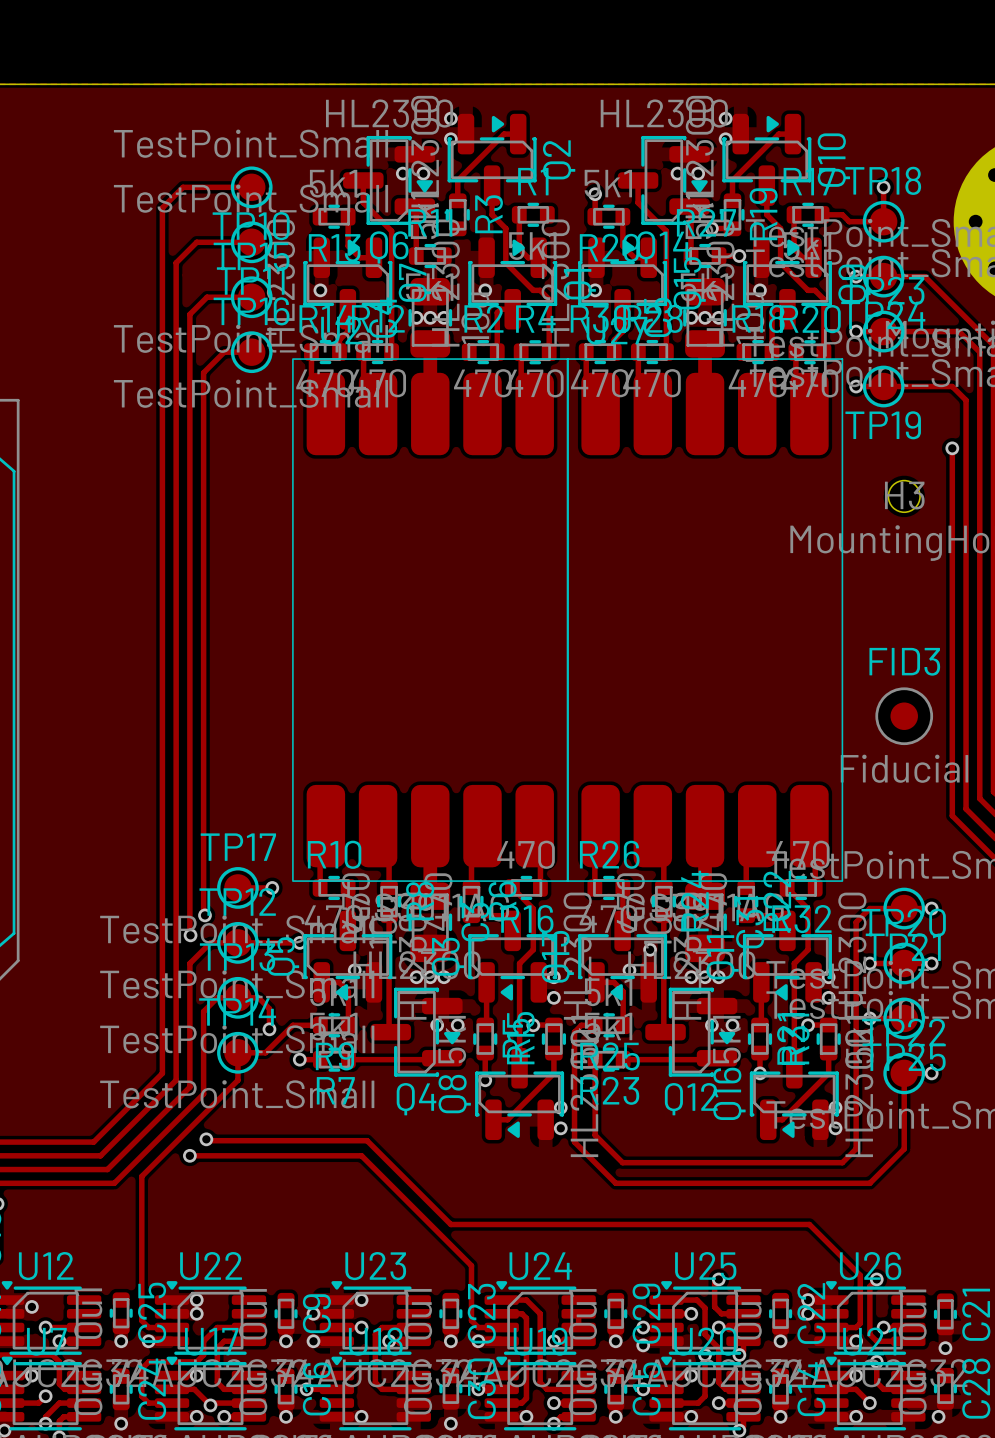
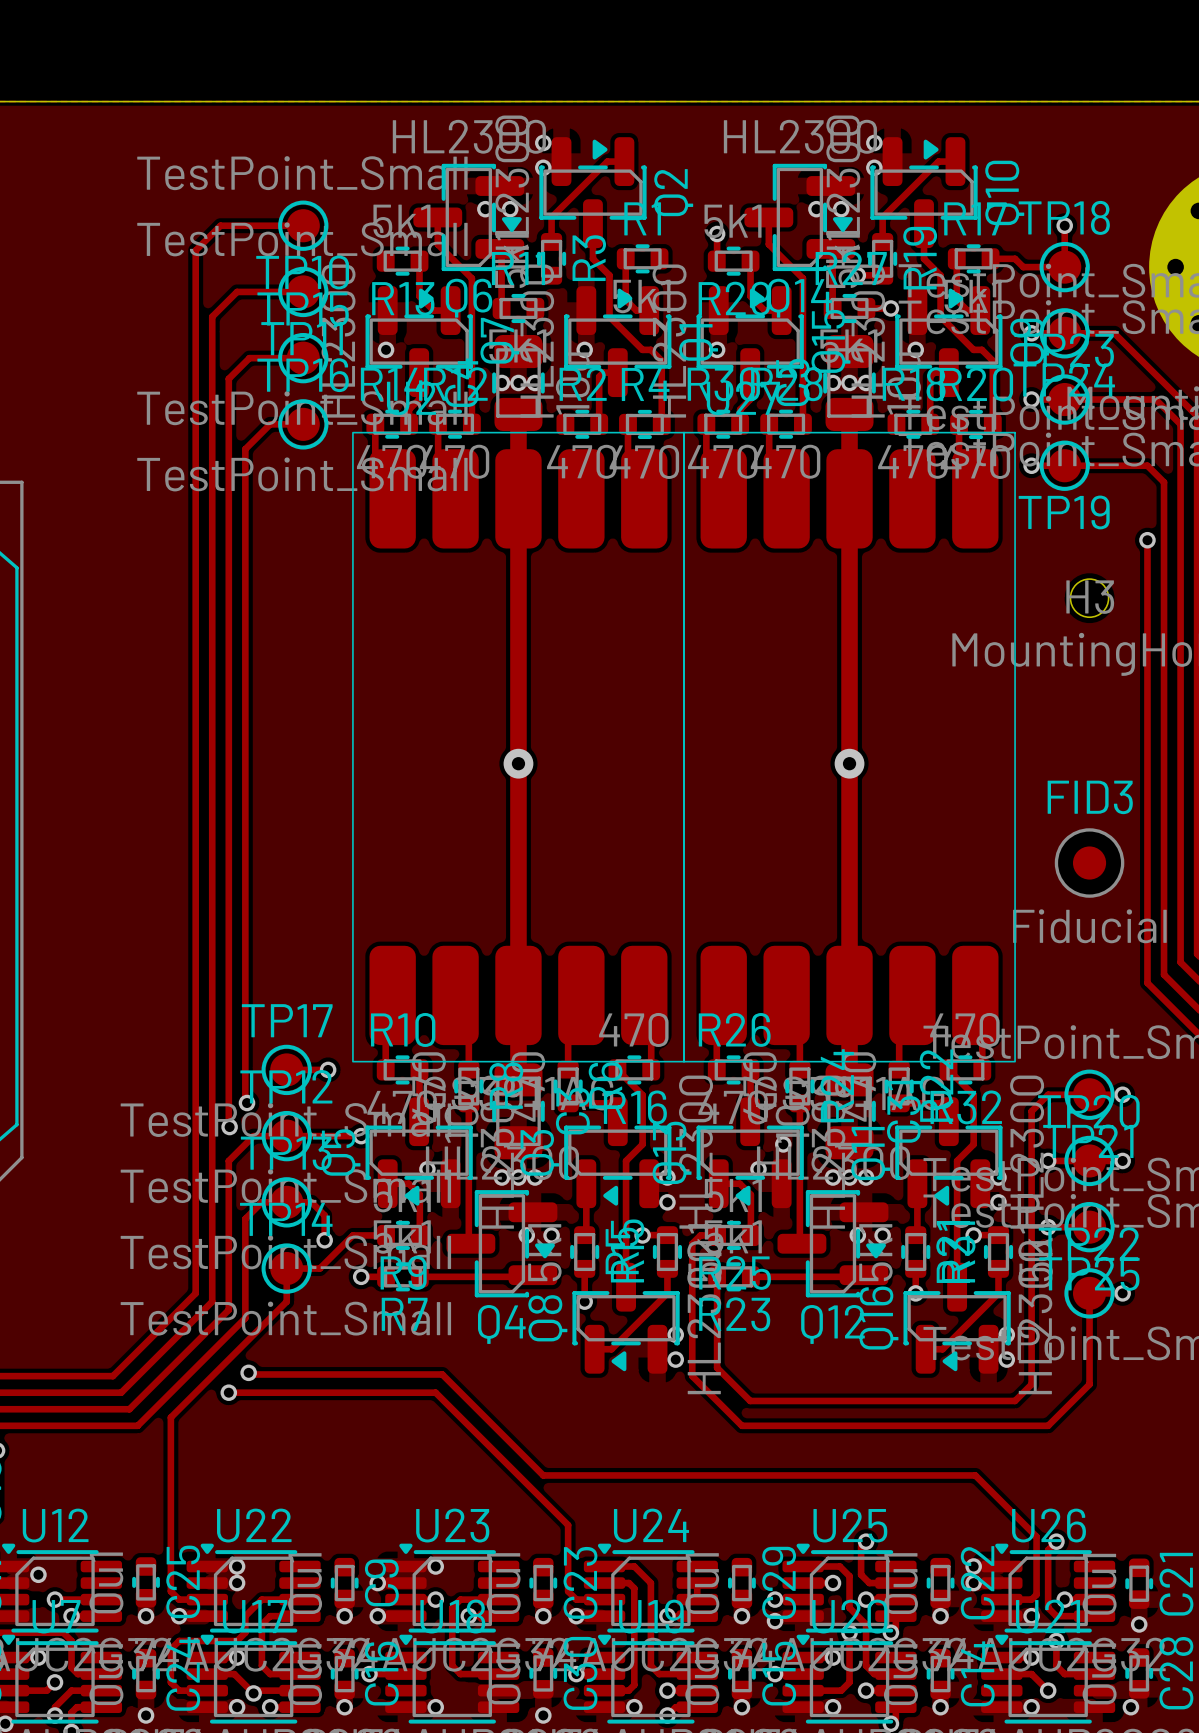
track: none -> (518, 498) (518, 995)
track: none -> (849, 498) (849, 995)
via: none -> (518, 763)
via: none -> (849, 763)

